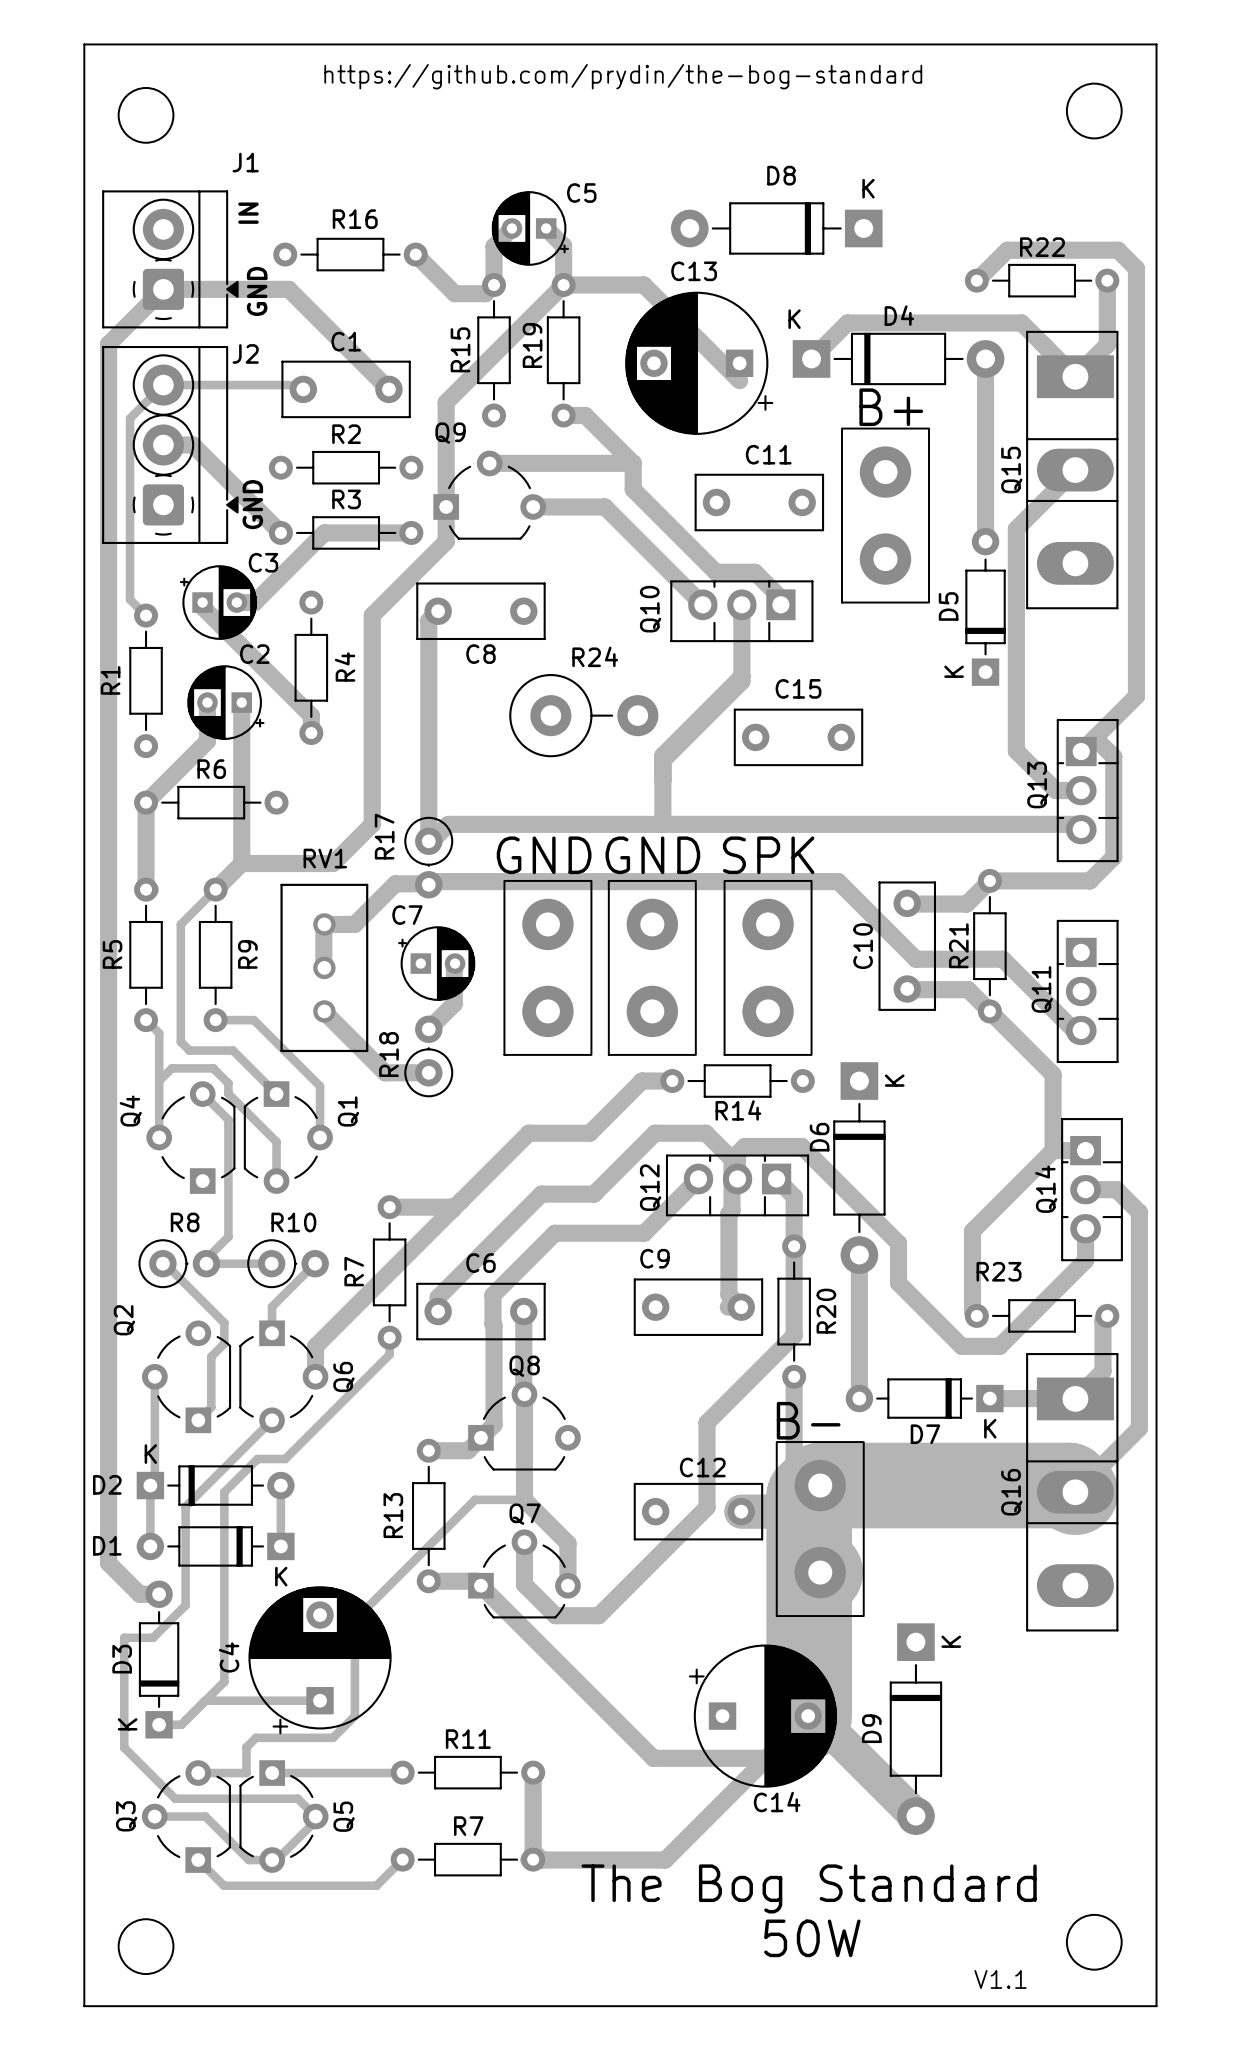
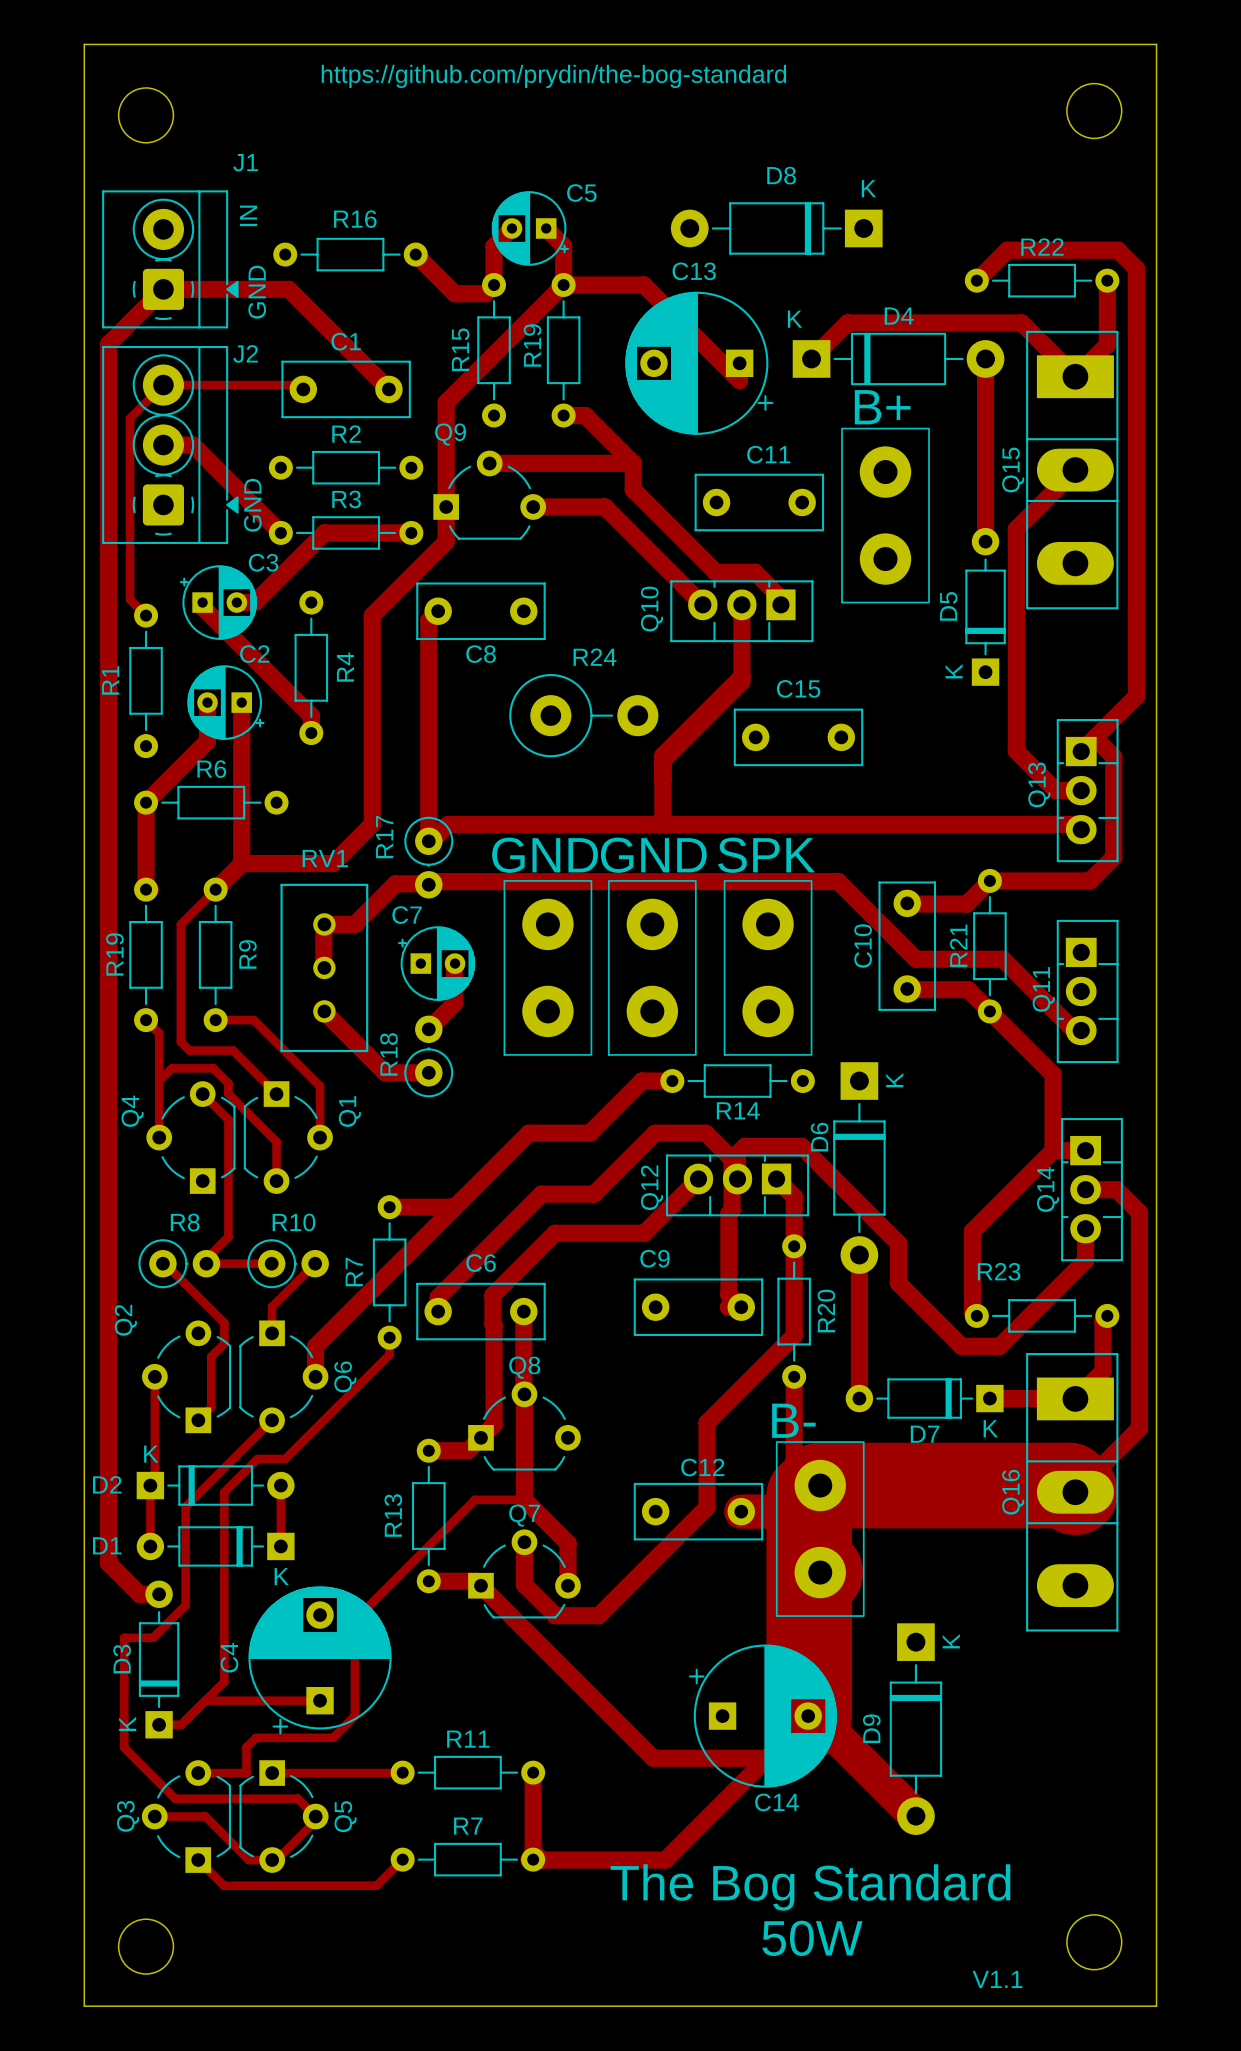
R5 name: R5 (112, 954) -> none
text: none -> R19 (114, 954)

